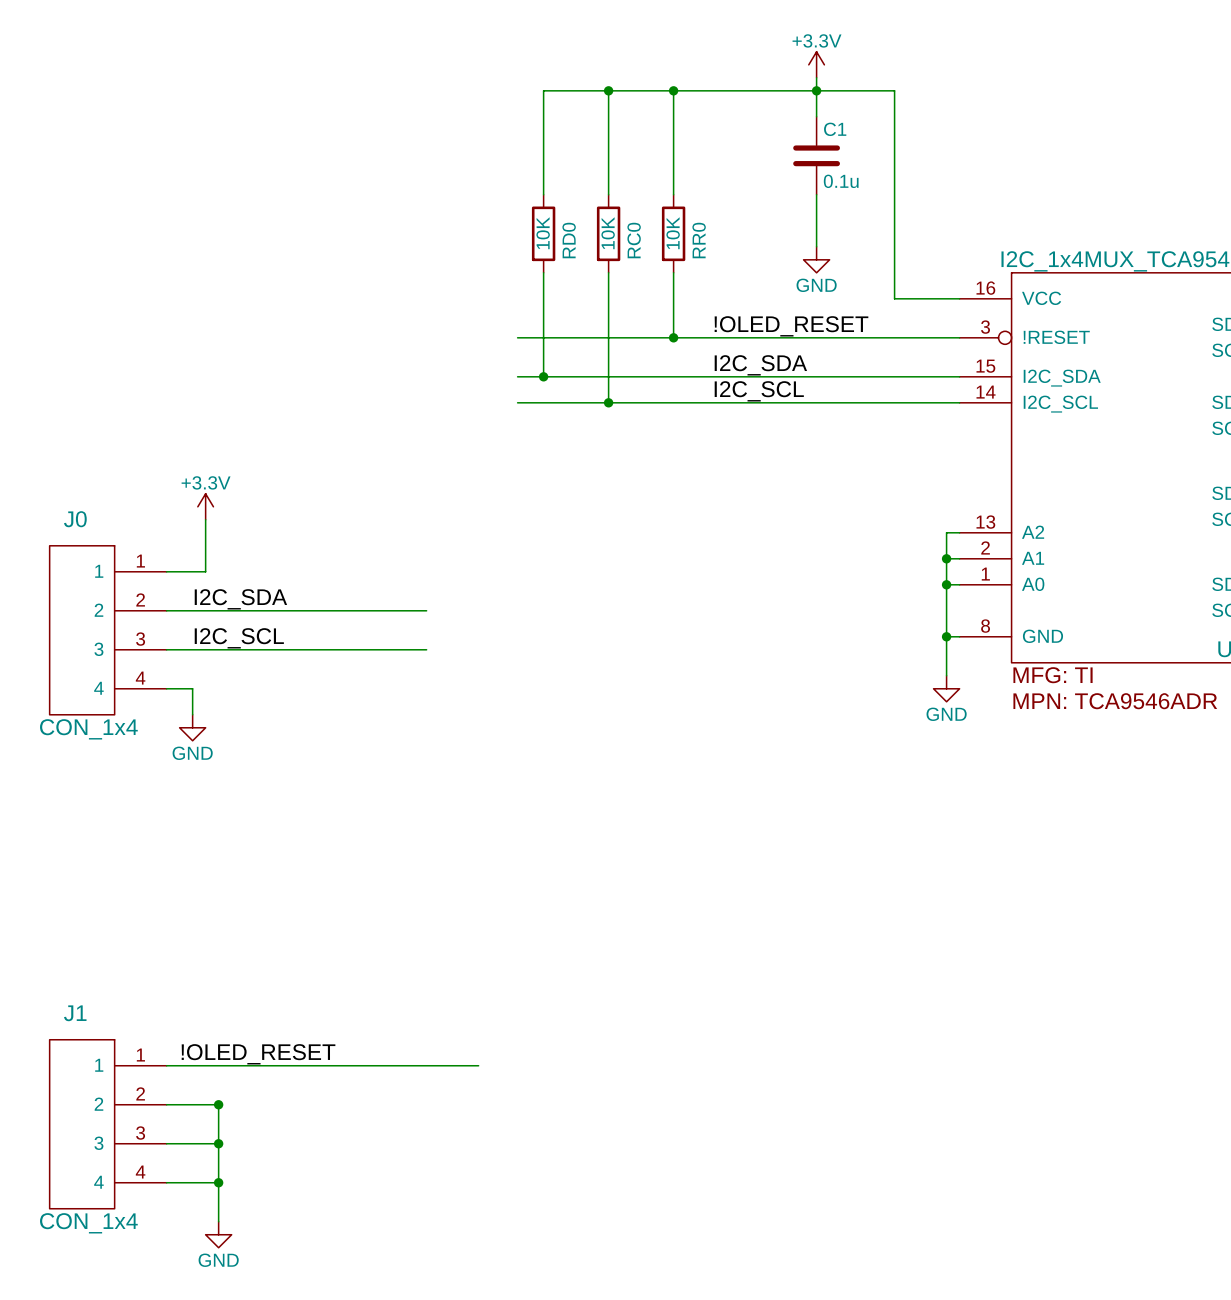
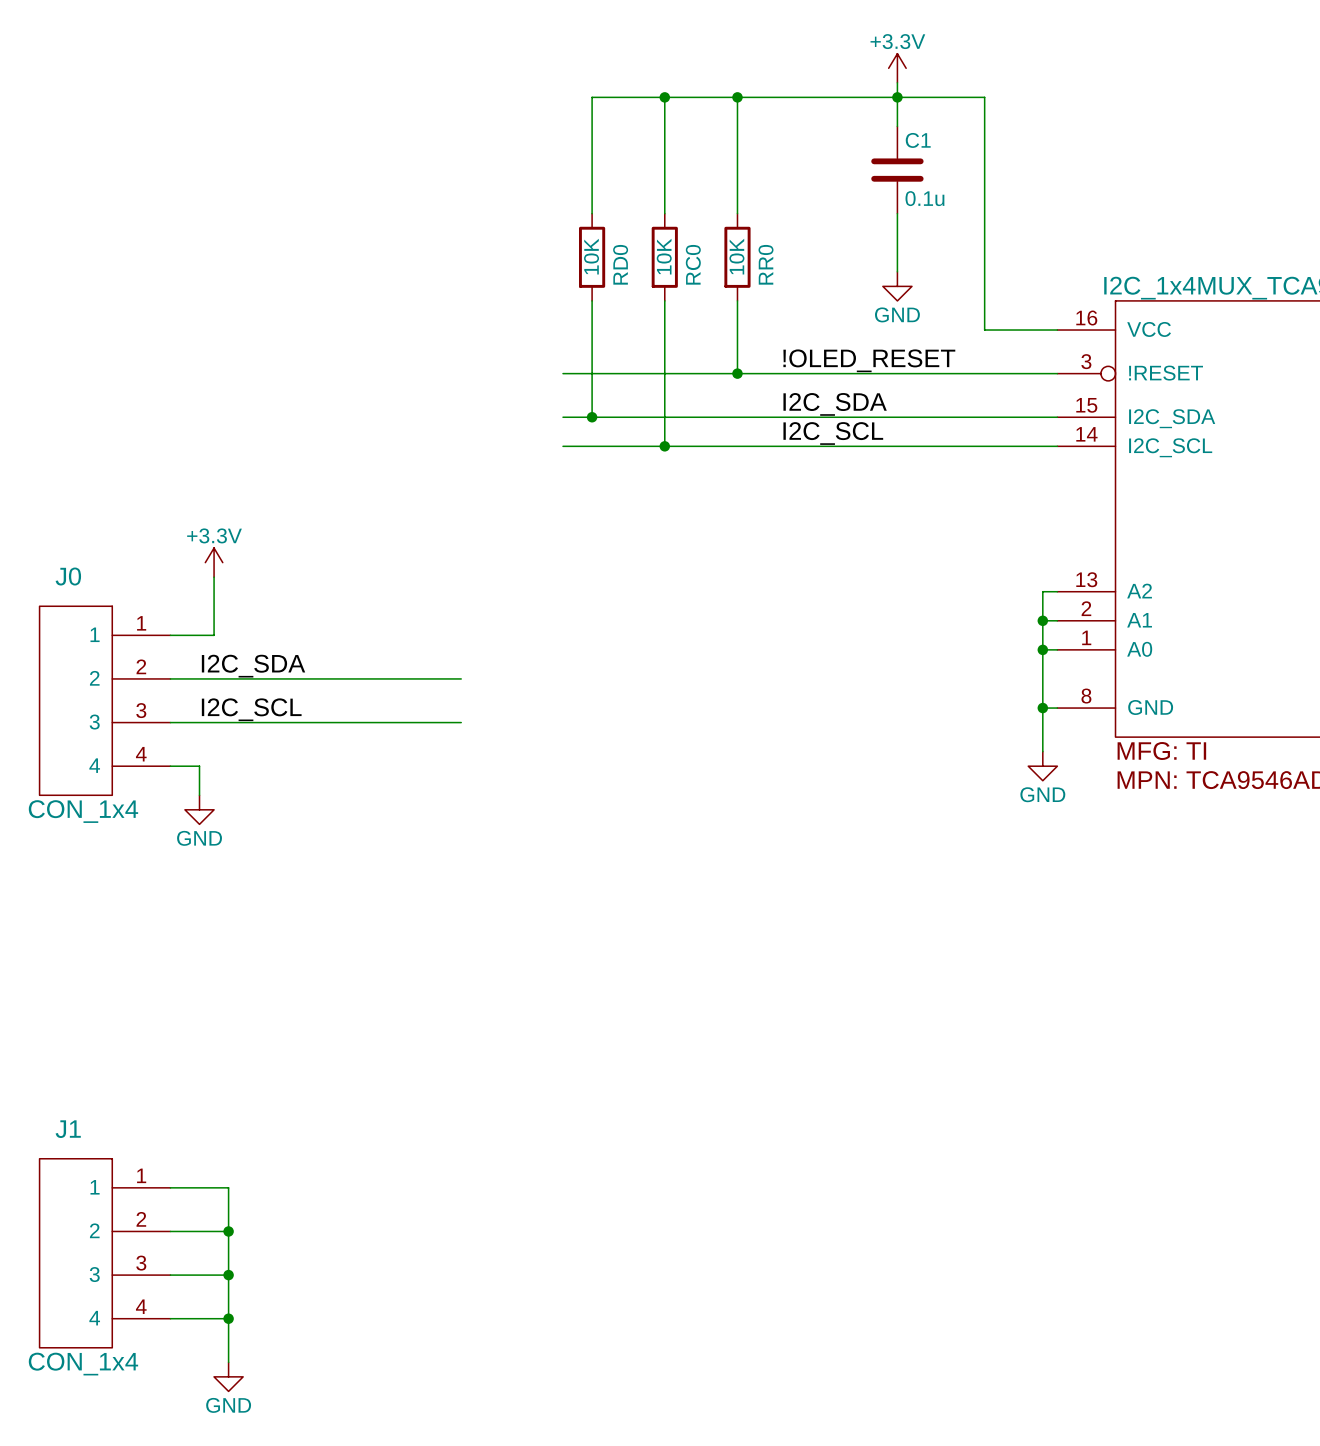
label: !OLED_RESET (258, 1054) -> none
wire: (218, 1065) (478, 1065) -> (228, 1187) (228, 1231)

